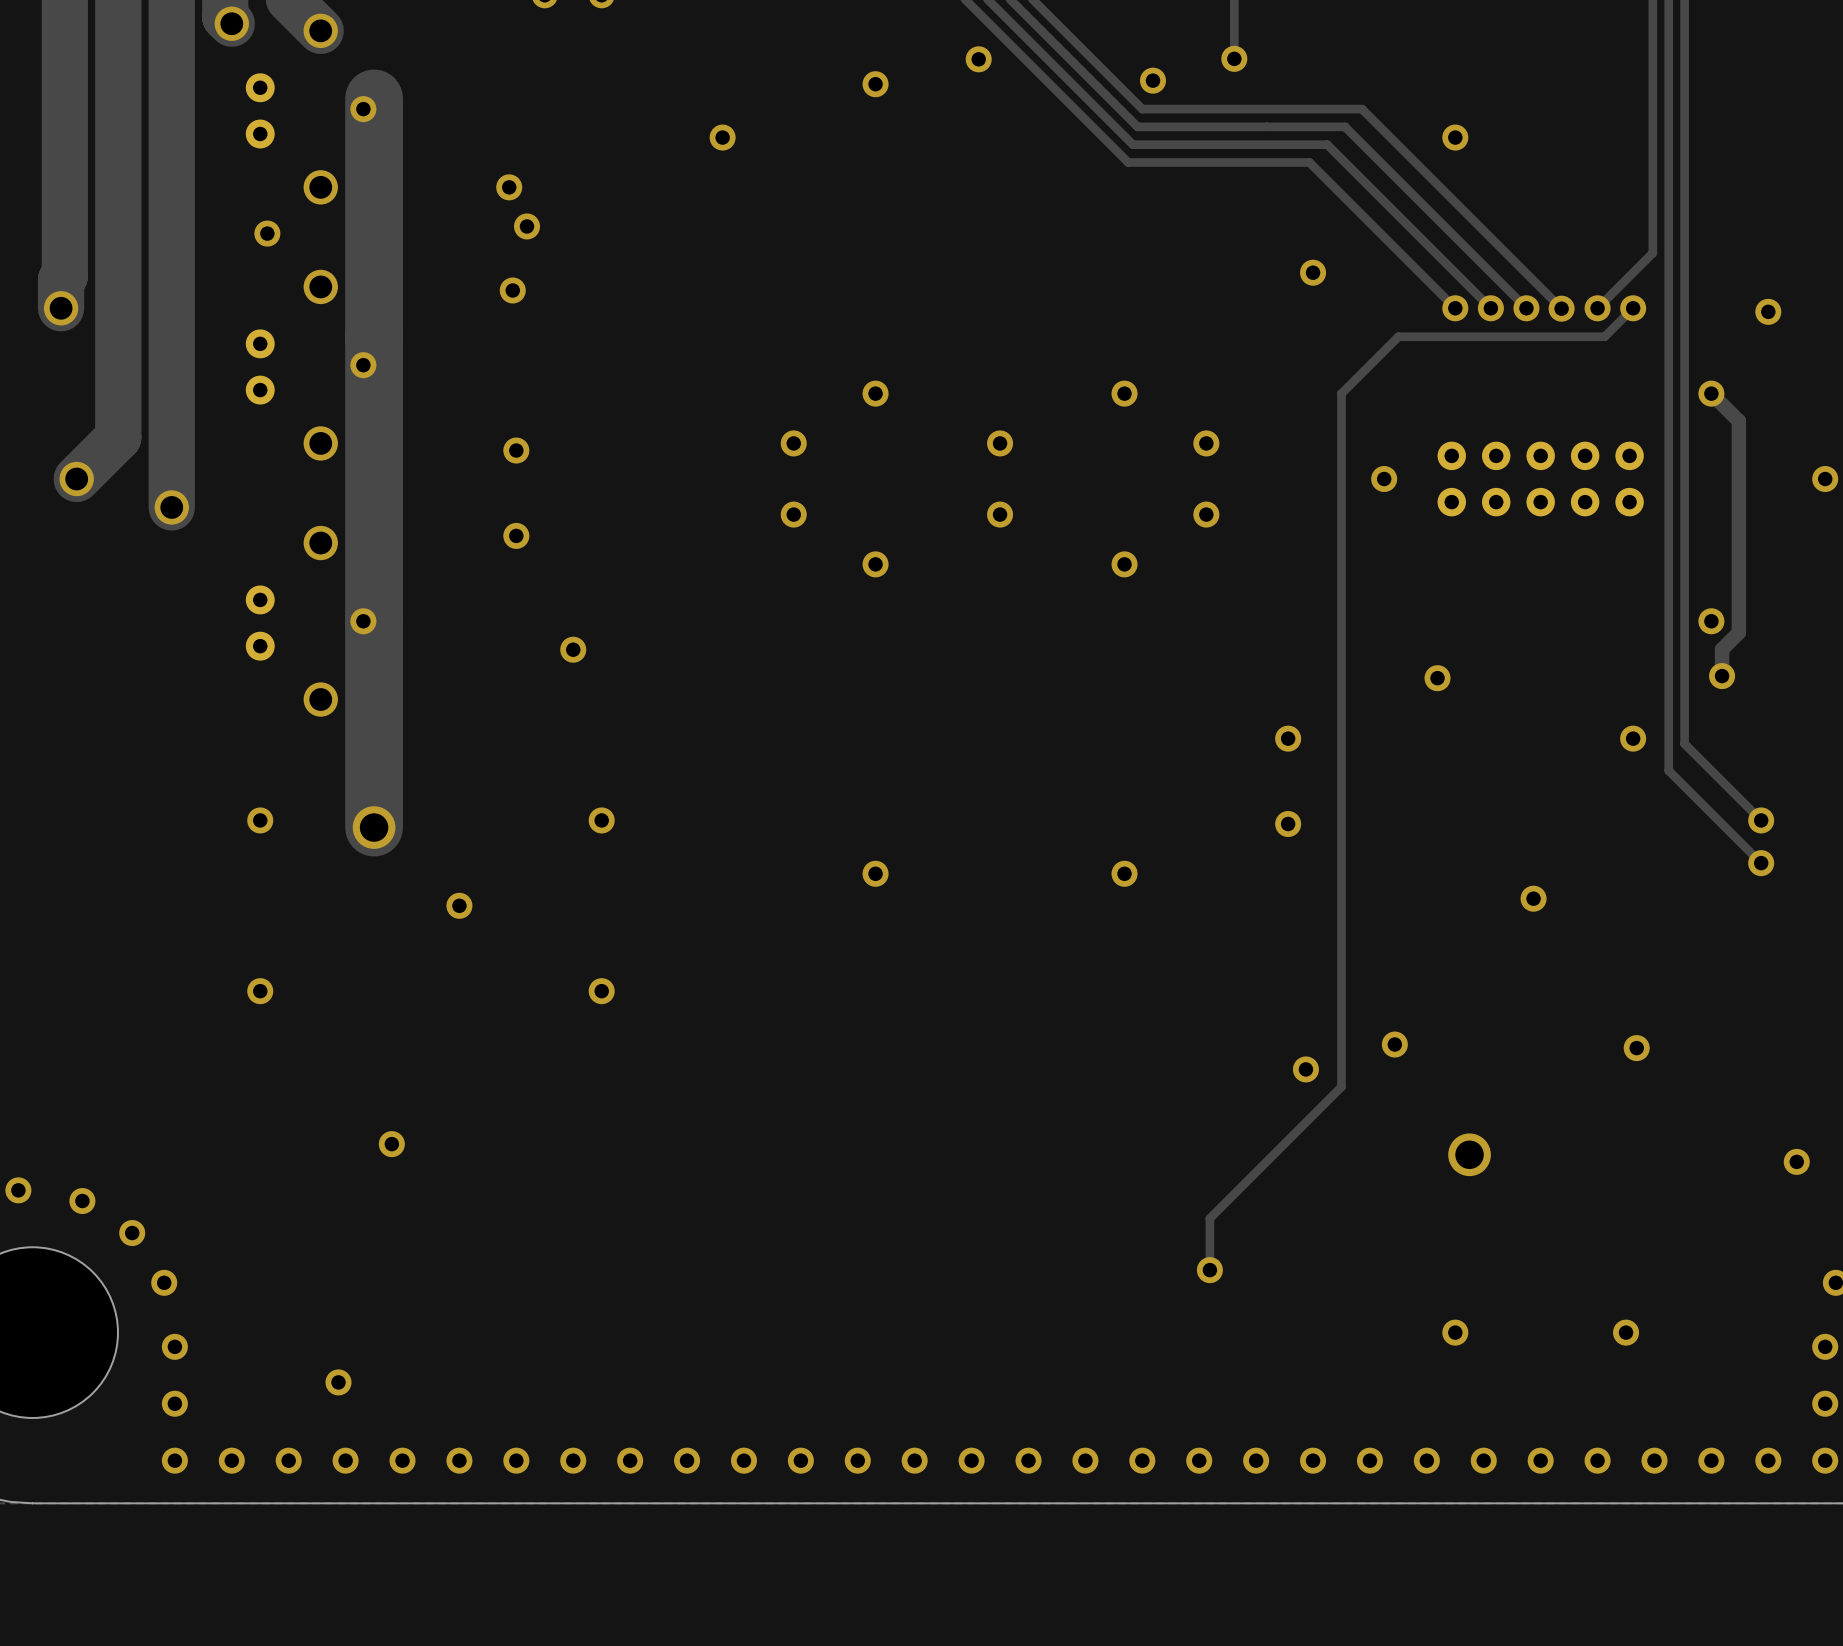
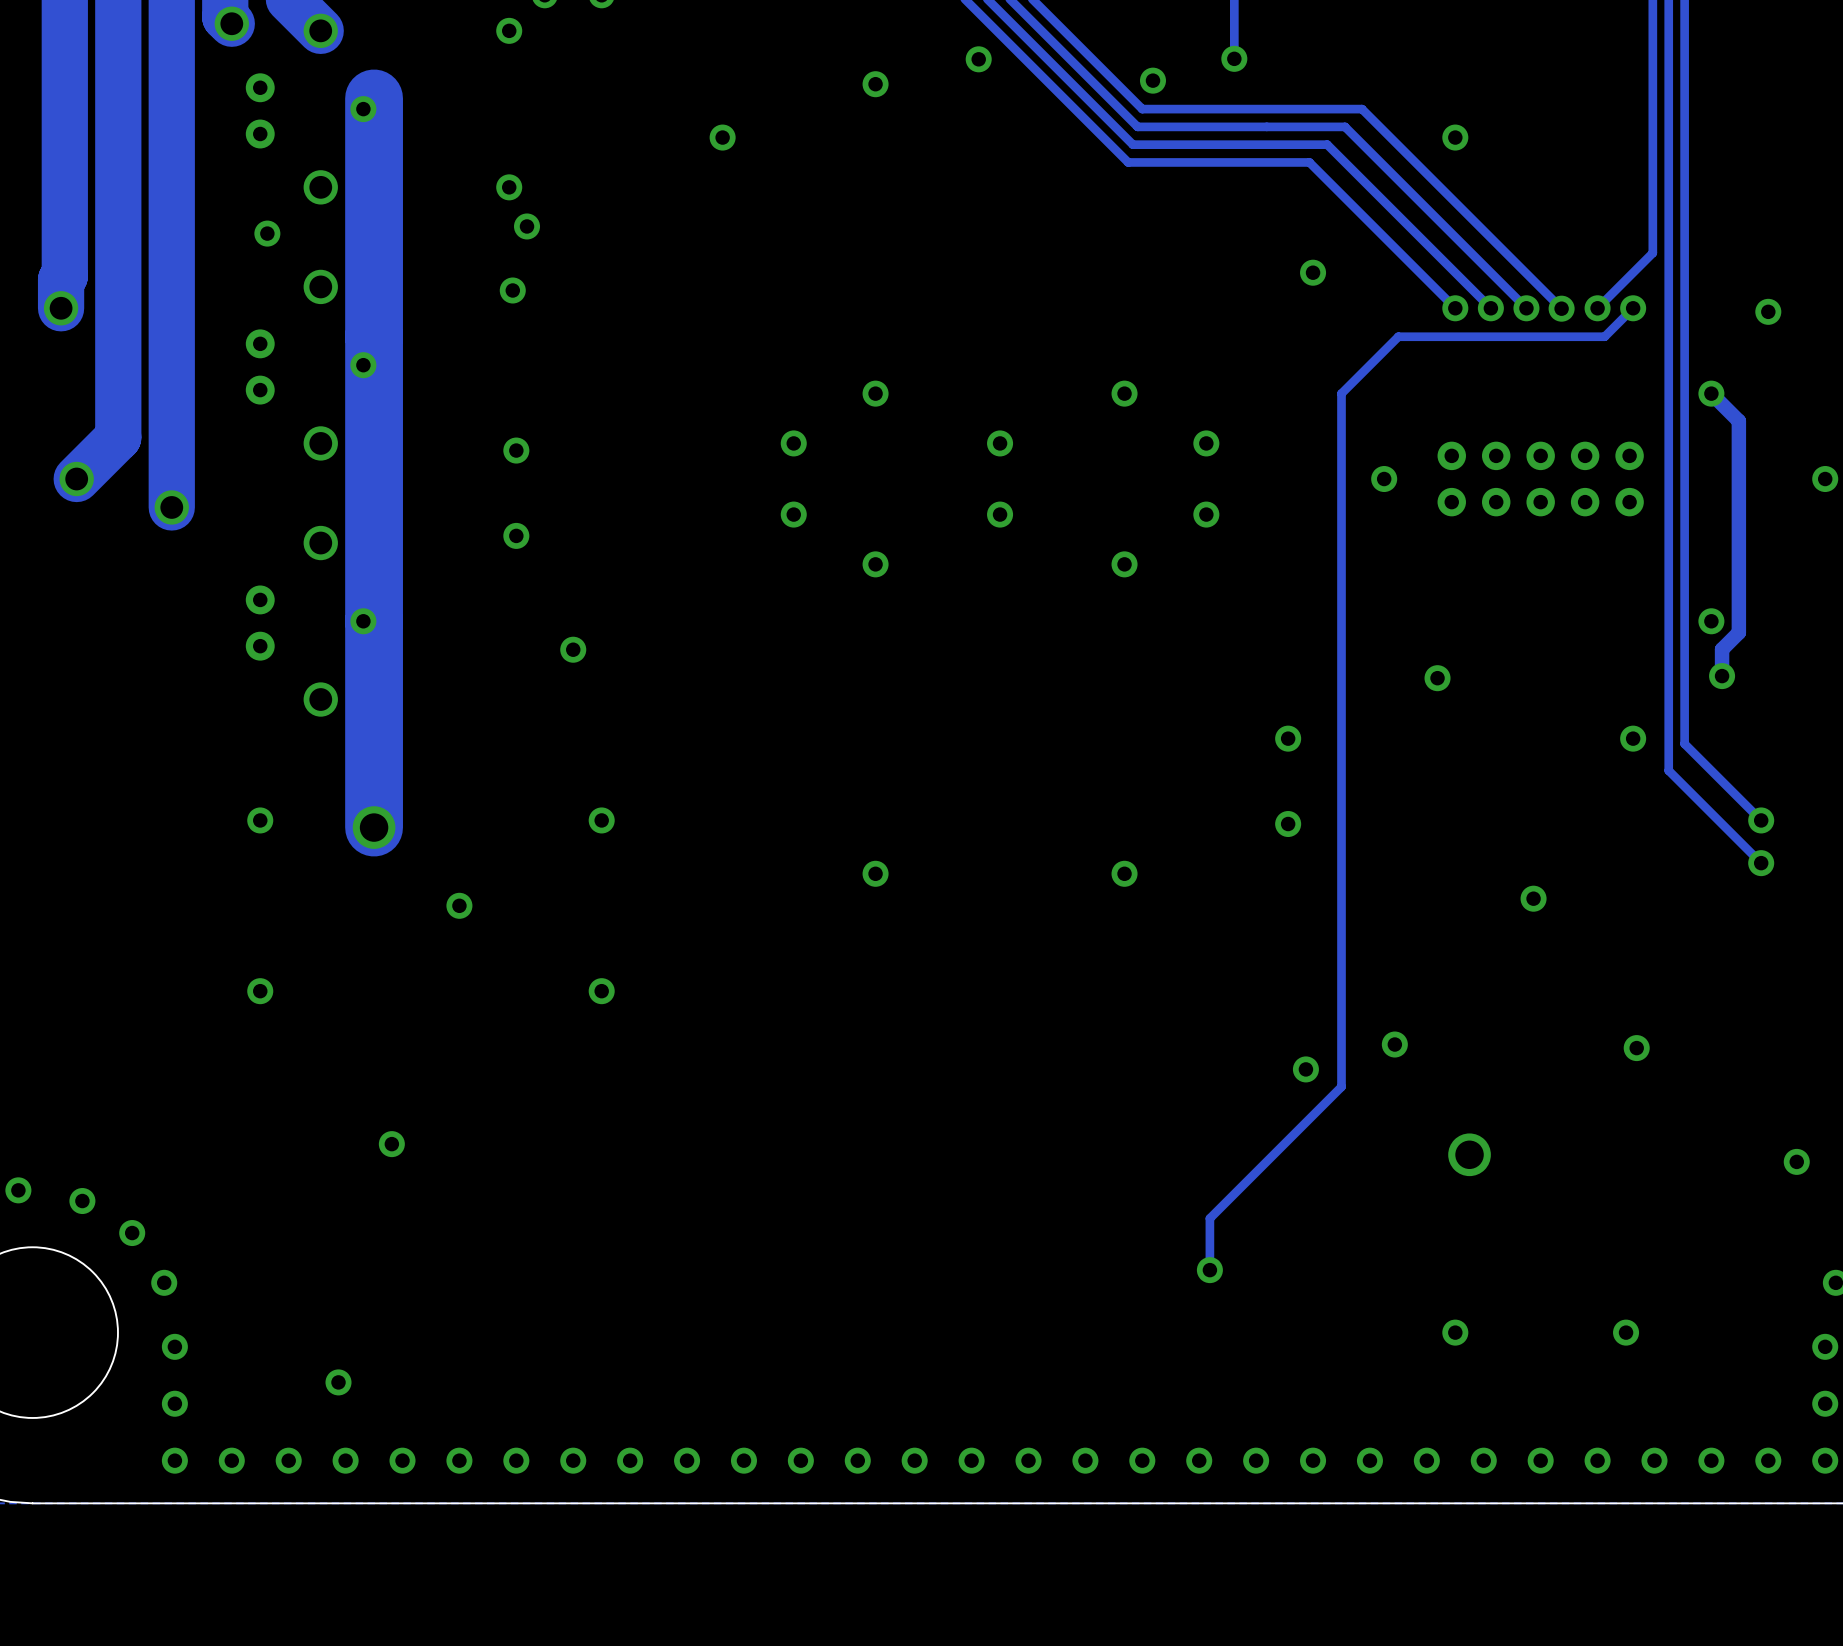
via: none -> (509, 30)

